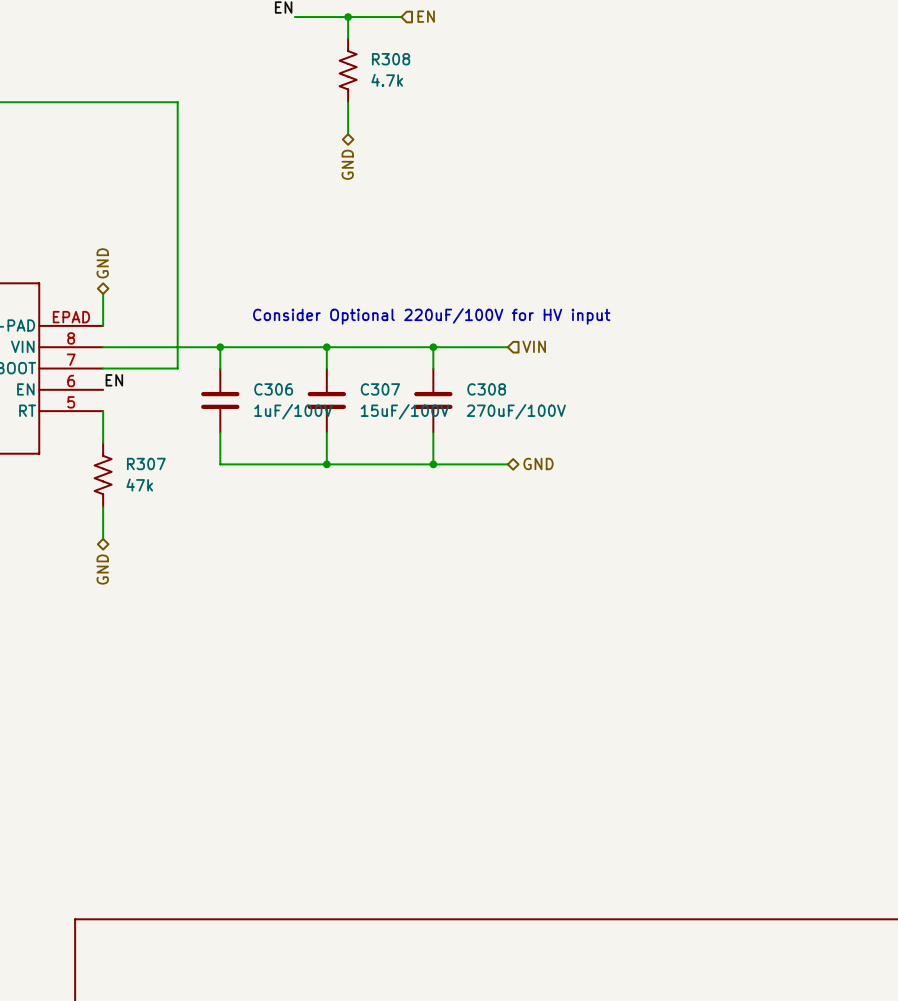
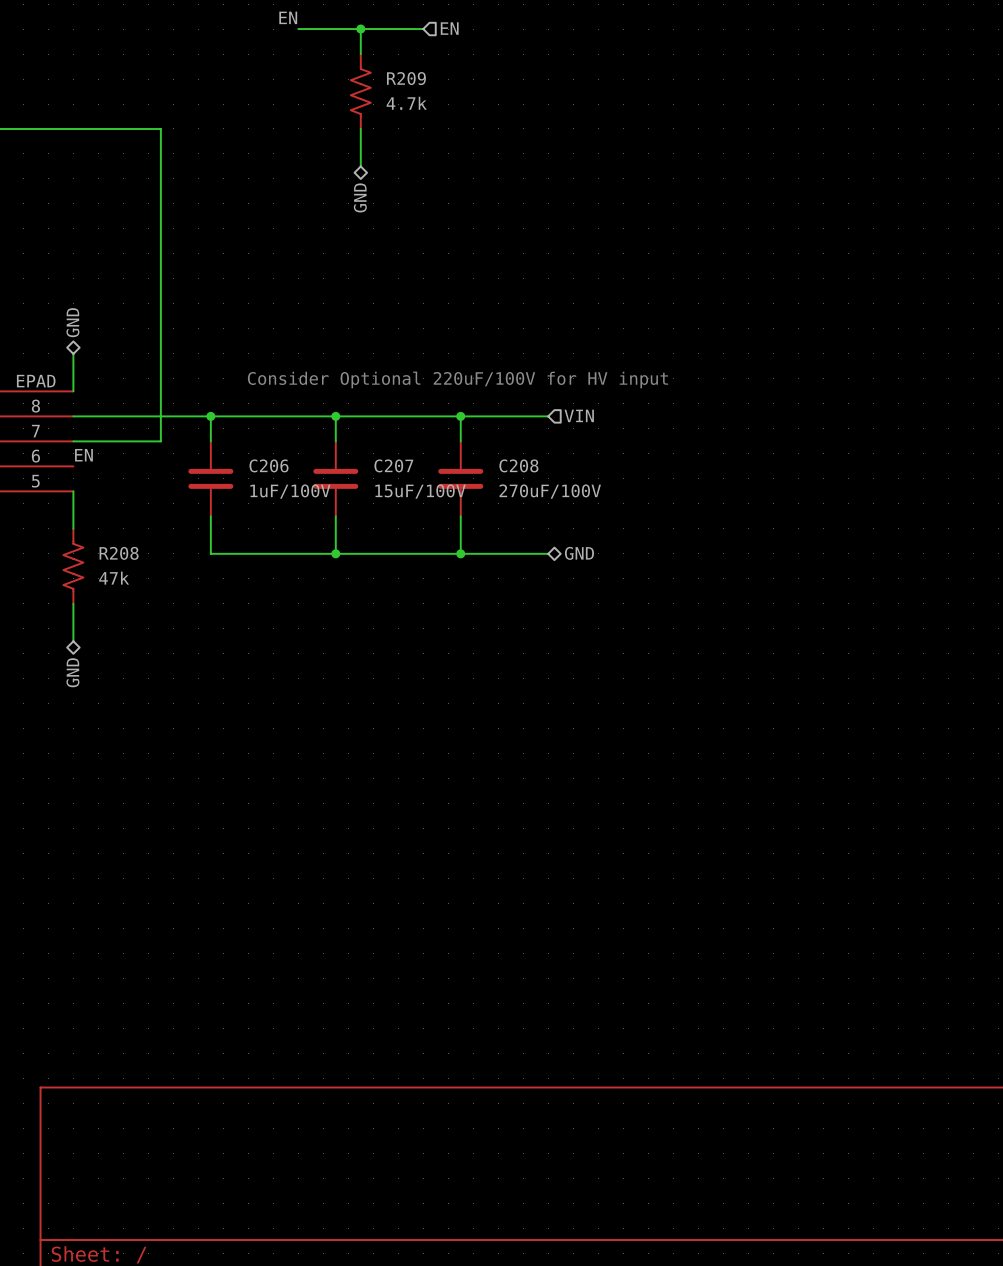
R308 name: R308 (391, 59) -> R209 (406, 78)
C306 name: C306 (273, 389) -> C206 (268, 465)
C307 name: C307 (380, 389) -> C207 (393, 465)
C308 name: C308 (486, 389) -> C208 (518, 465)
R307 name: R307 (146, 463) -> R208 (119, 553)

